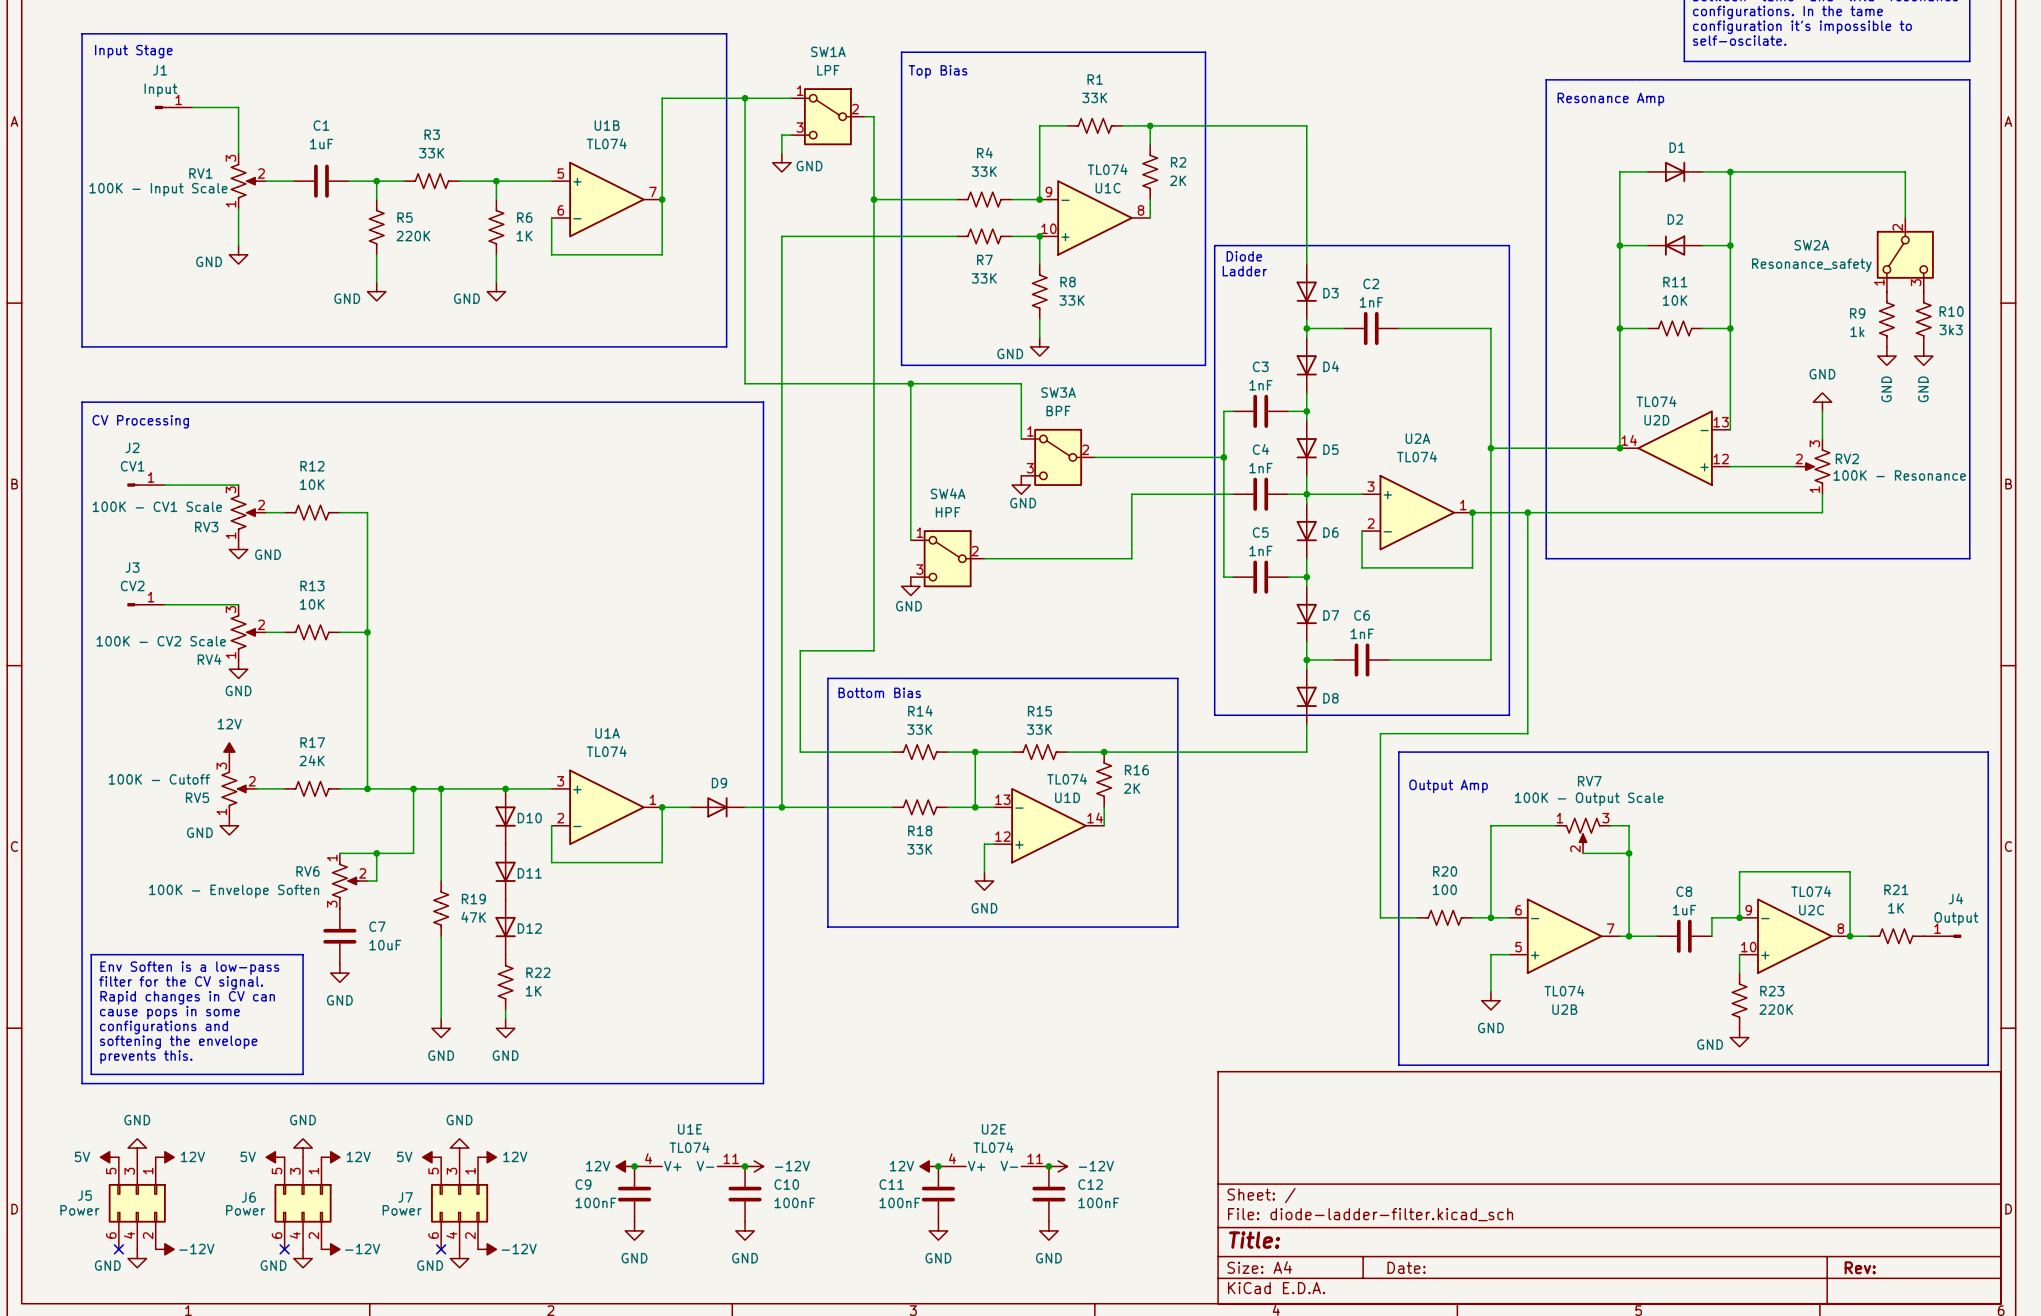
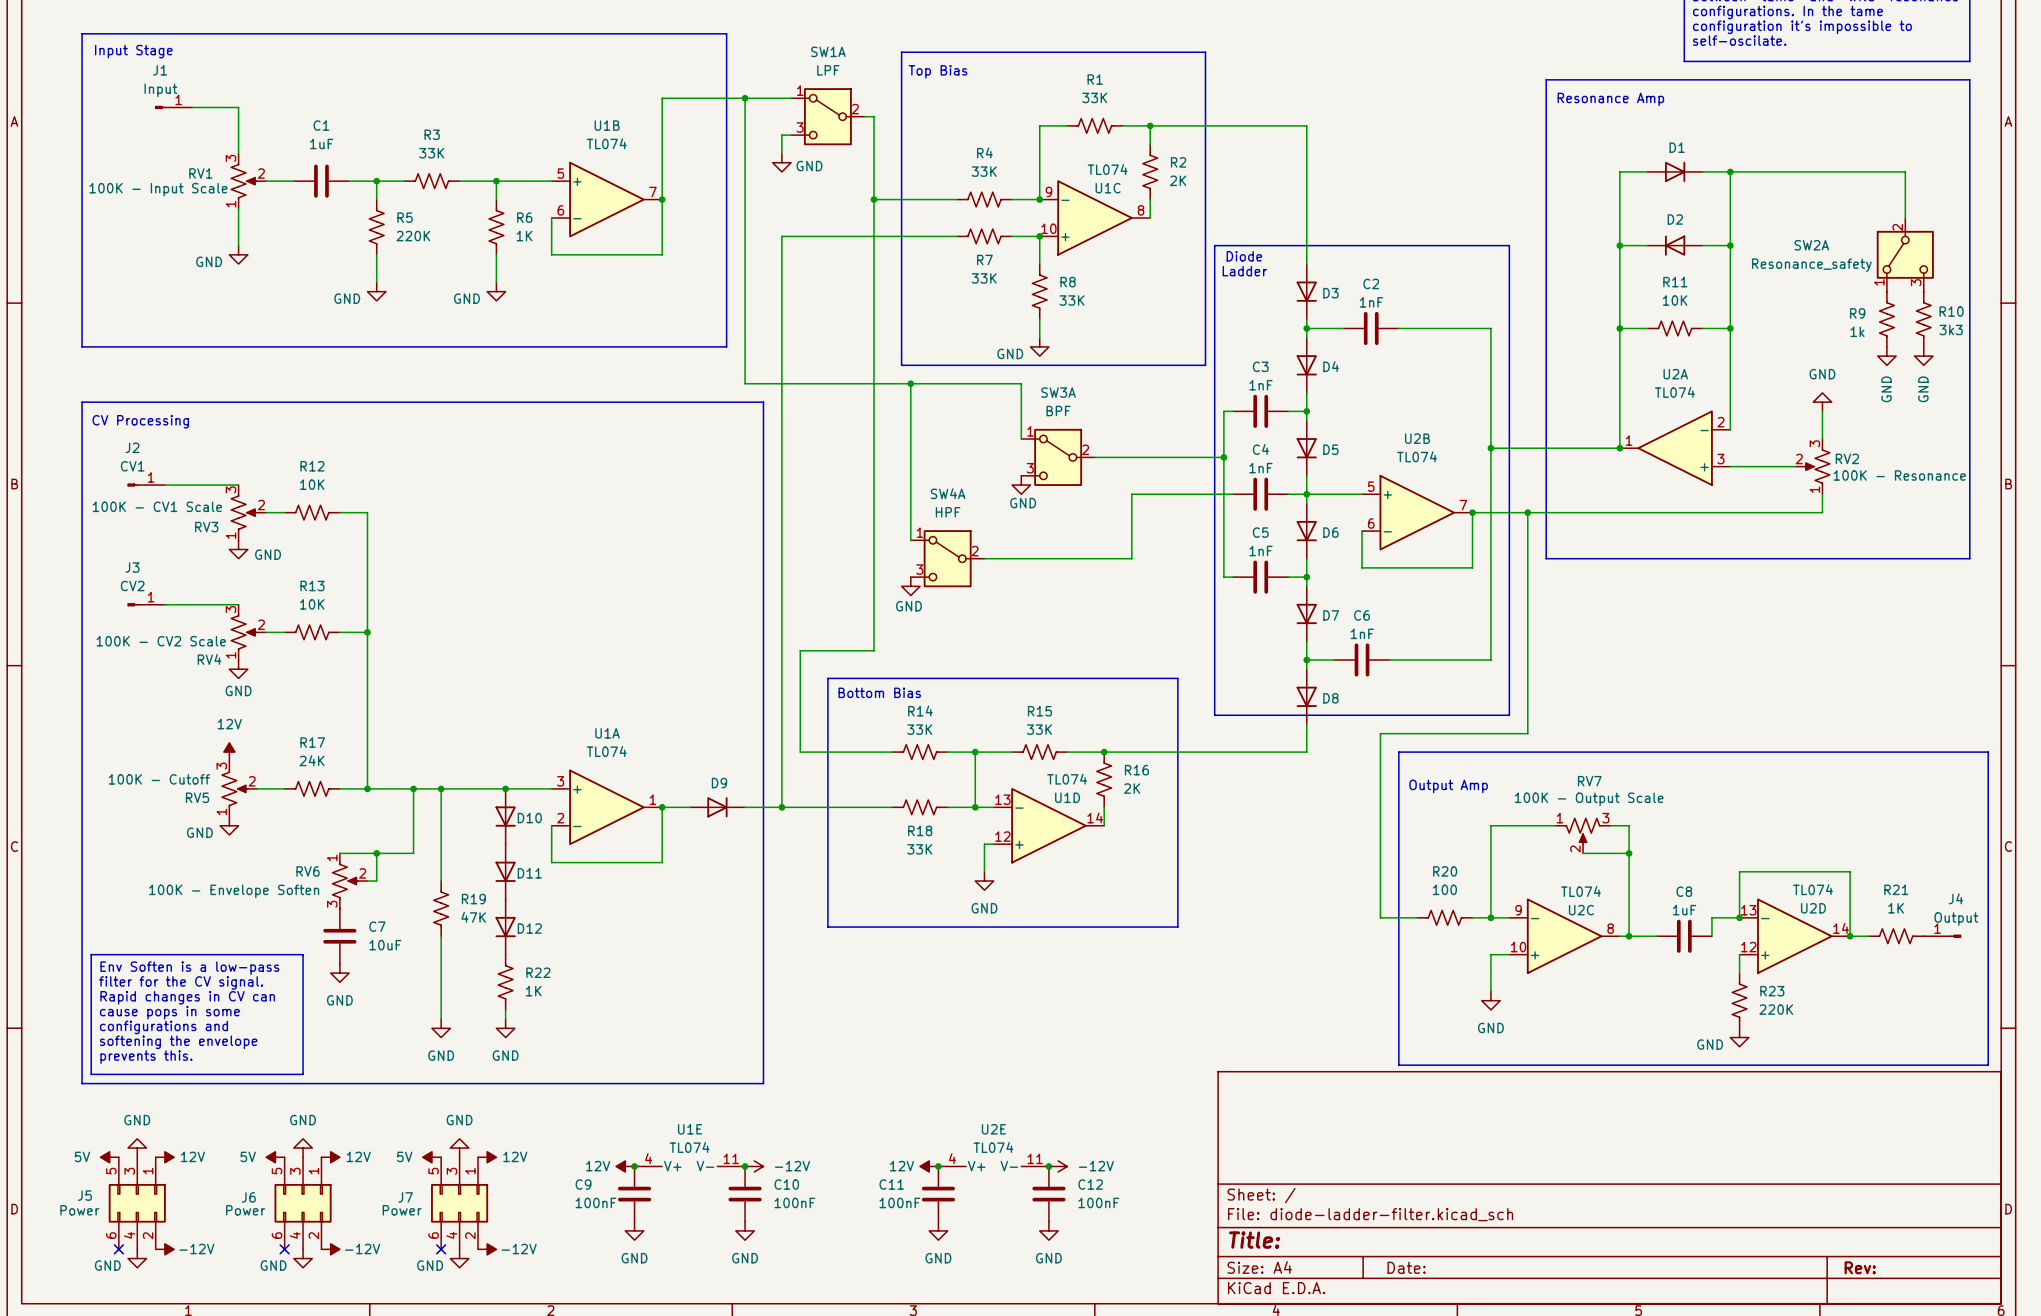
U2D flip: as is (1675, 448) -> left-right (1794, 936)
U2D position: (1675, 448) -> (1794, 936)
U2A rotation: 0° (1417, 512) -> 180° (1675, 448)
U2A position: (1417, 512) -> (1675, 448)
U2B flip: as is (1564, 936) -> up-down (1417, 512)
U2B position: (1564, 936) -> (1417, 512)
U2C position: (1794, 936) -> (1564, 936)

